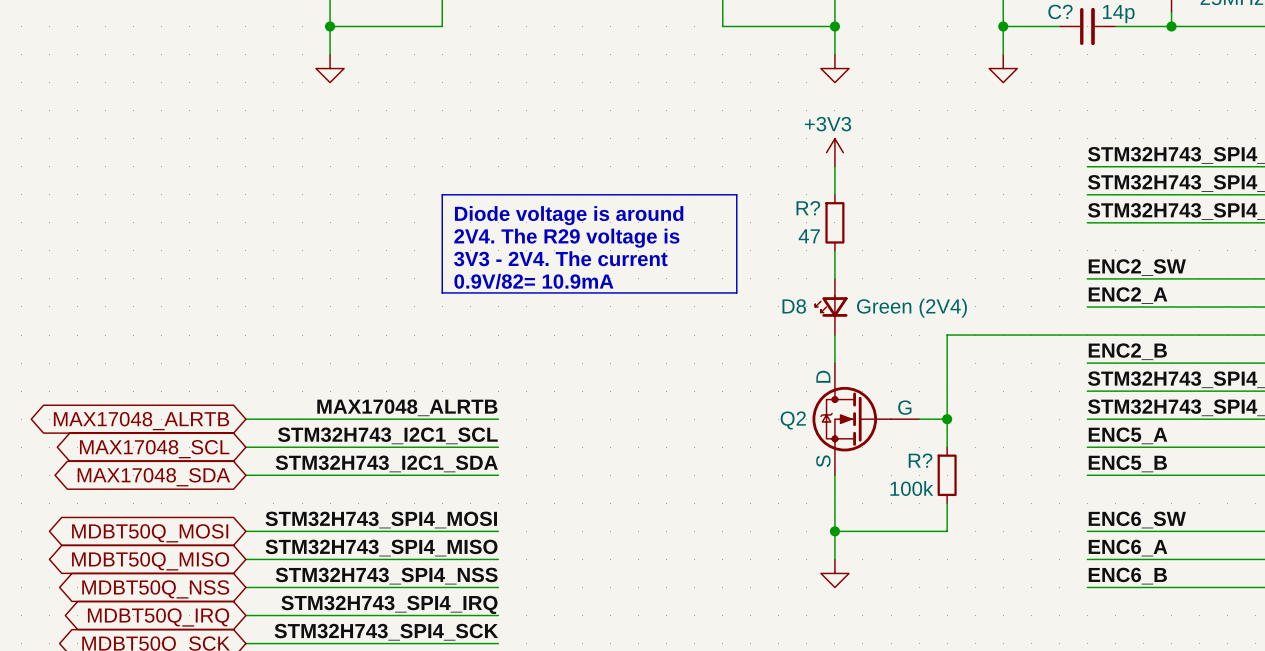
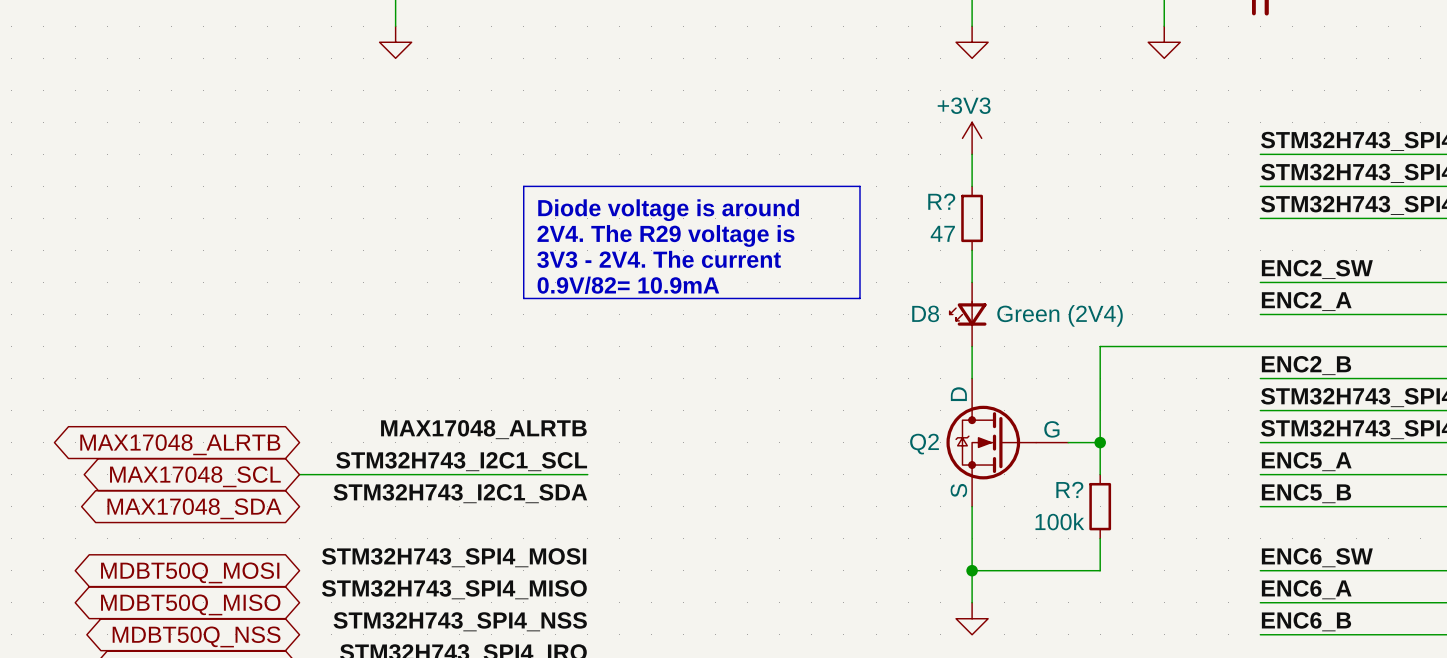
wire: (245, 419) (498, 419) -> none
wire: (245, 475) (498, 475) -> none
wire: (245, 531) (498, 531) -> none
wire: (245, 559) (498, 559) -> none
wire: (245, 587) (498, 587) -> none

